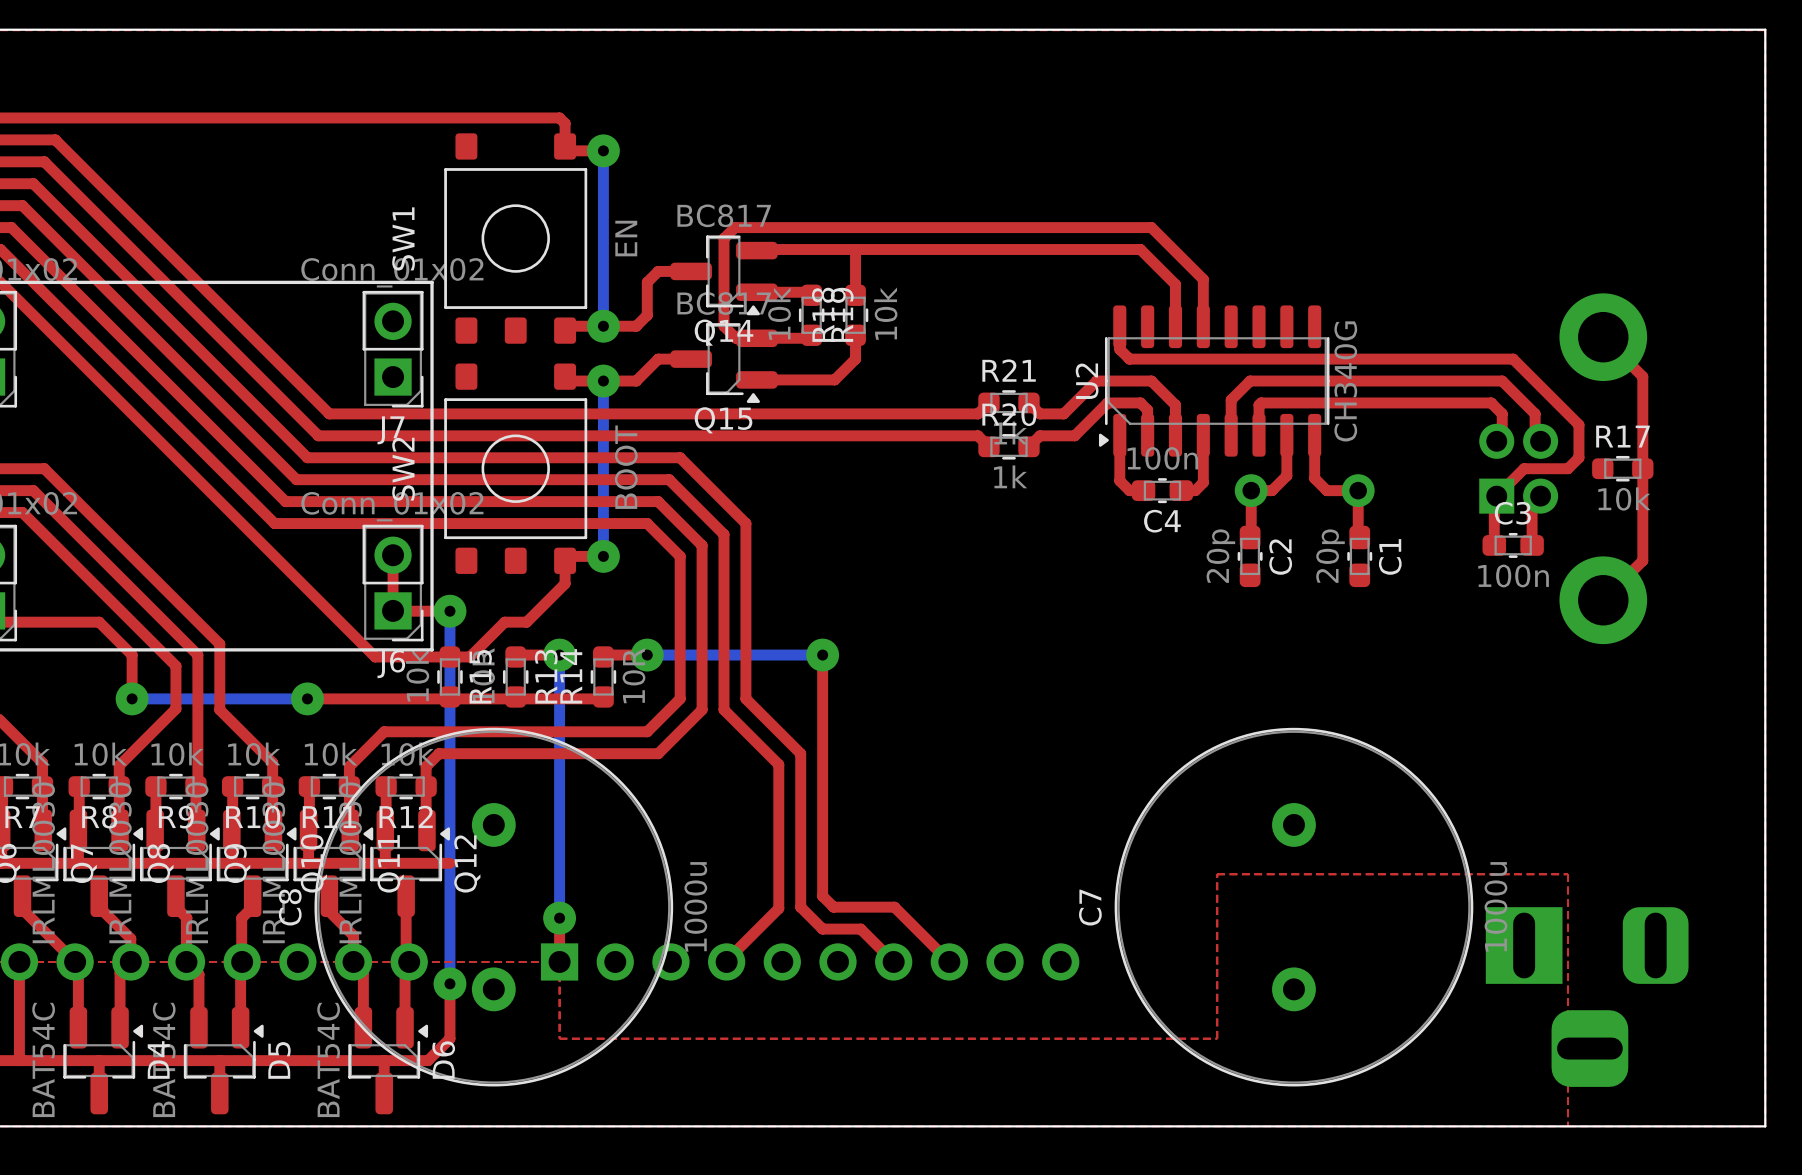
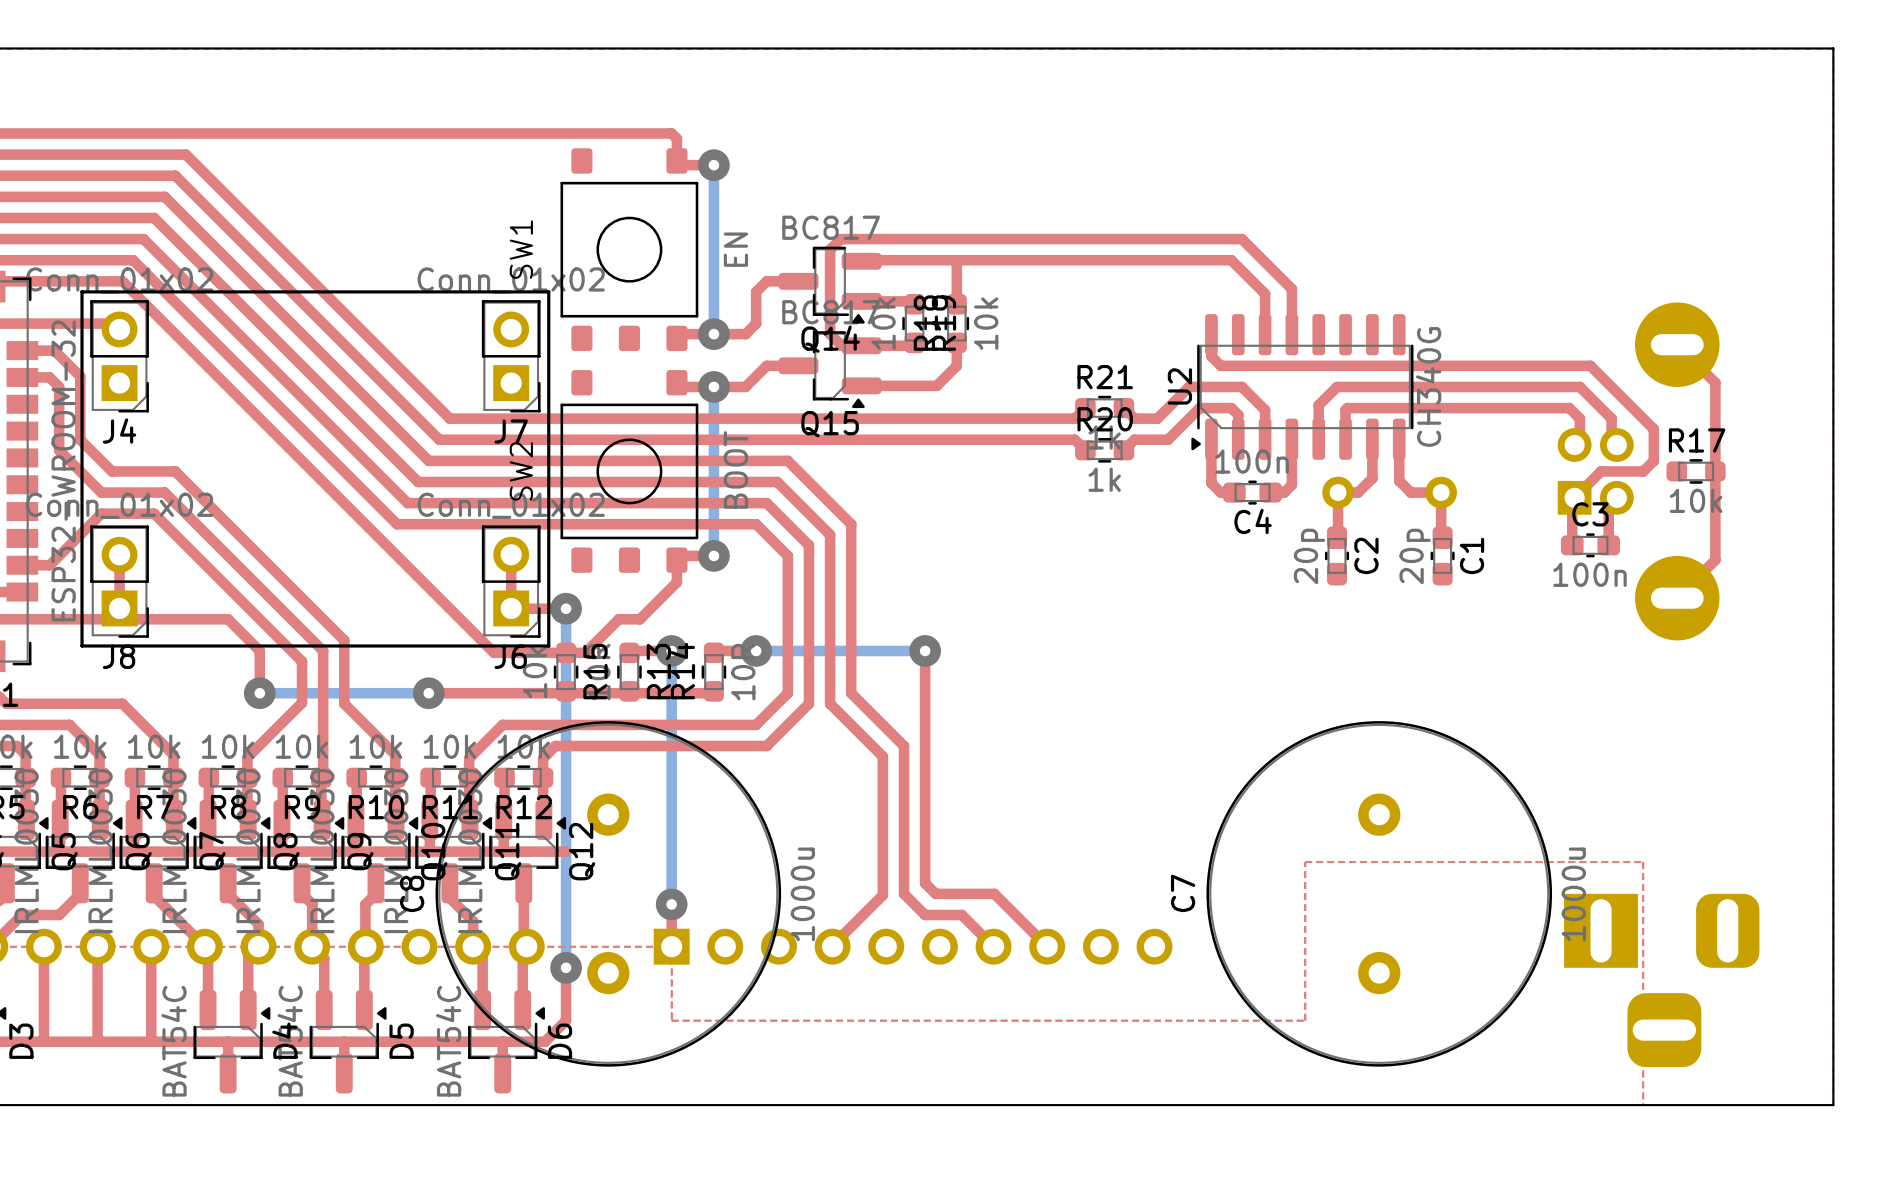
part footprint: [1479, 293, 1648, 645] -> [1557, 302, 1720, 641]

